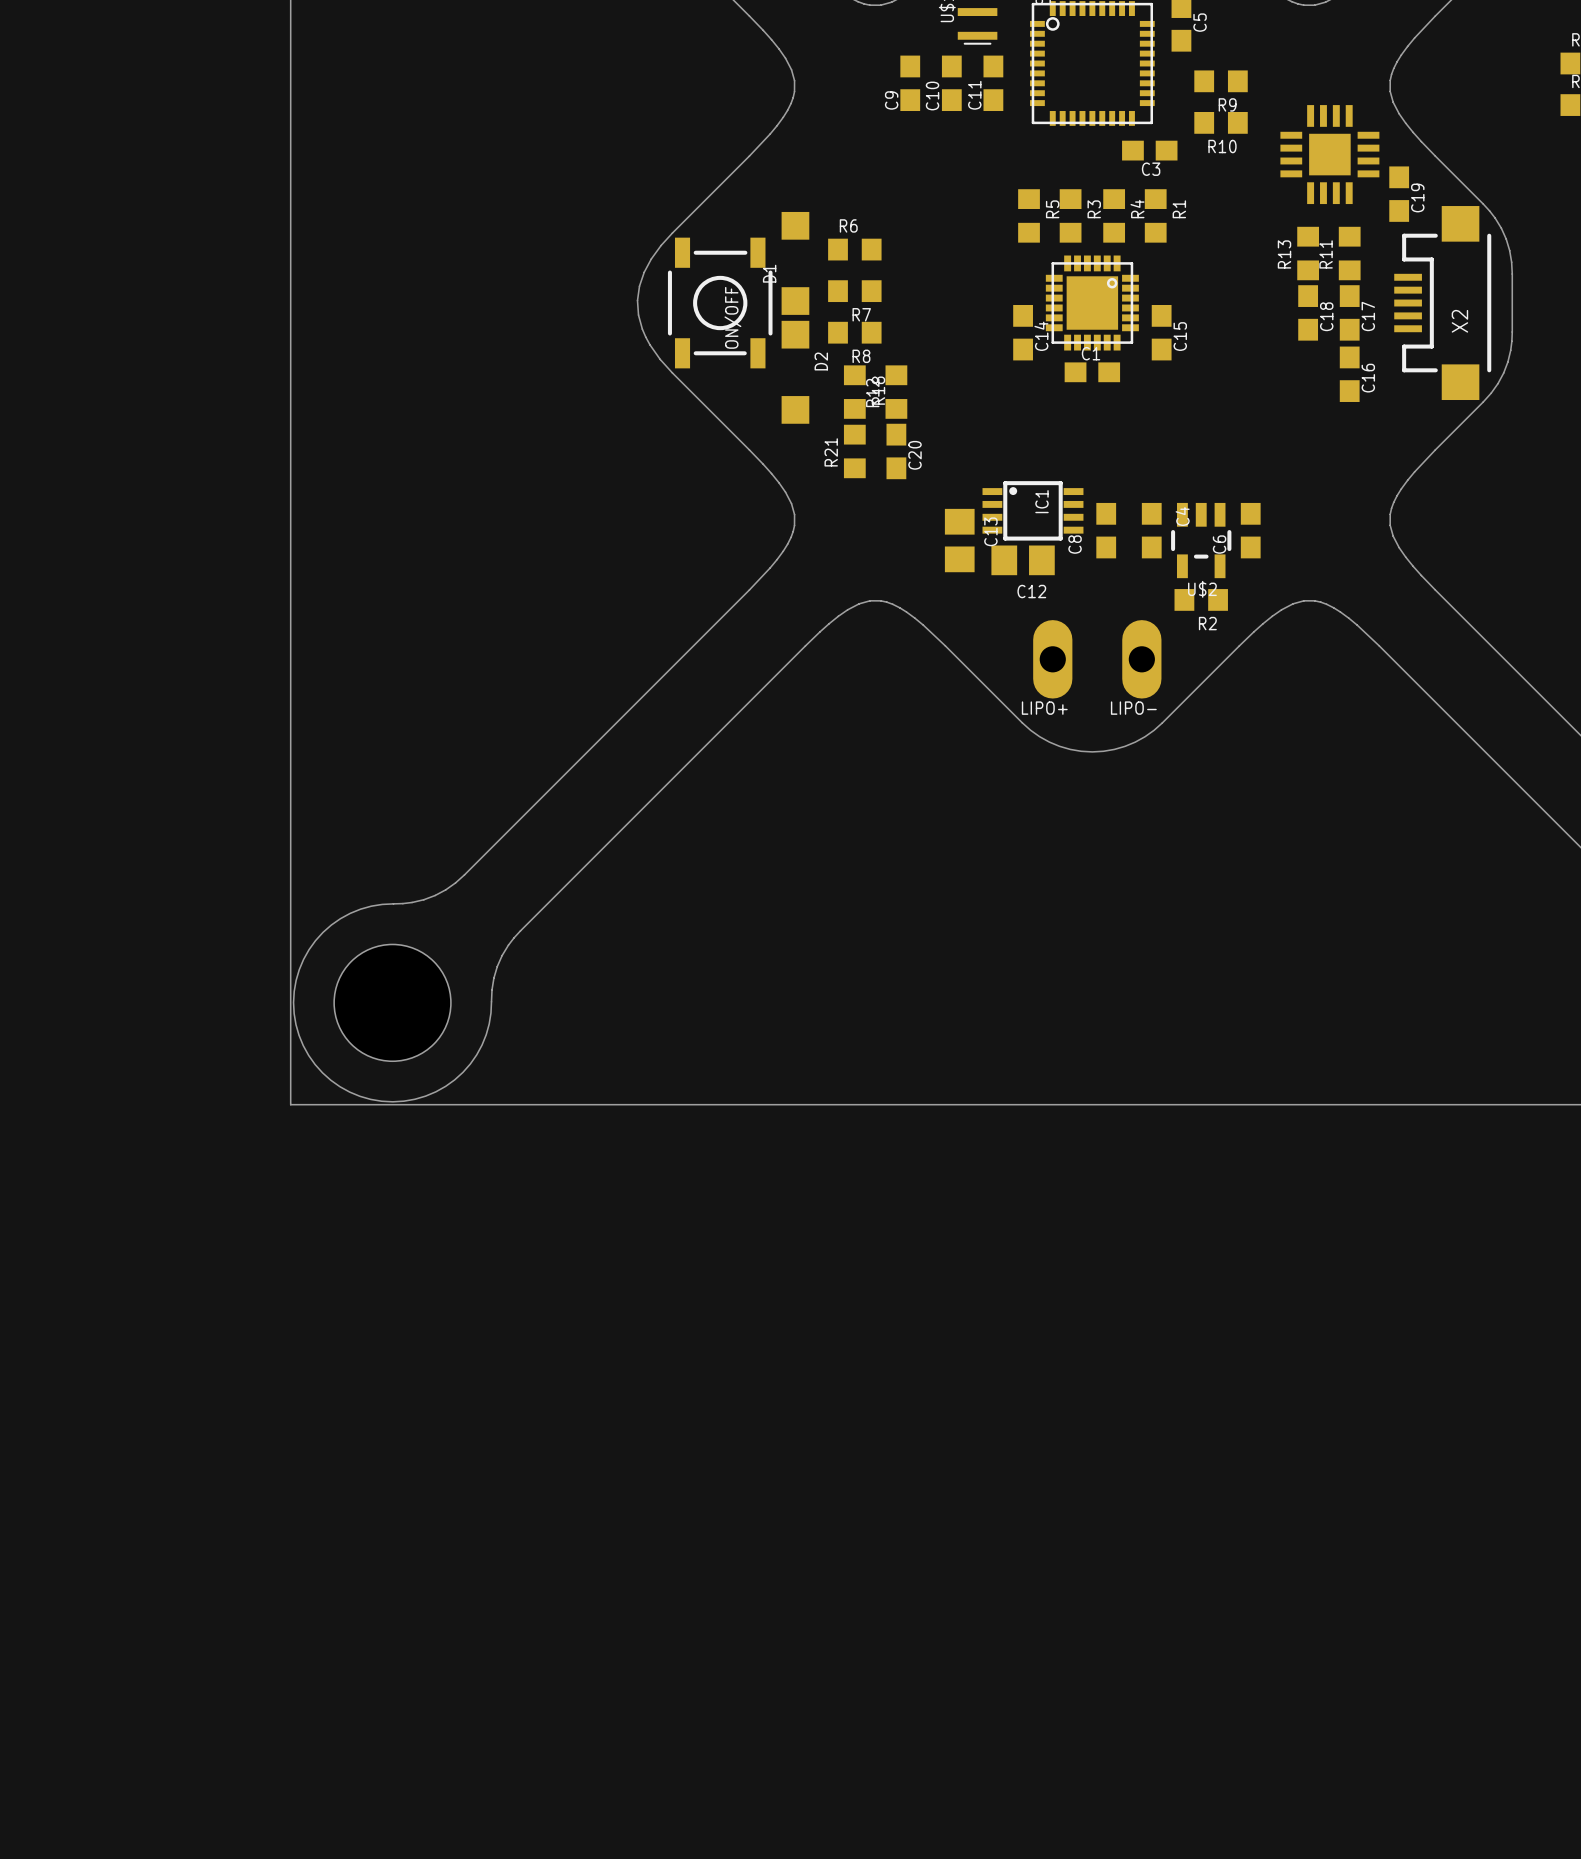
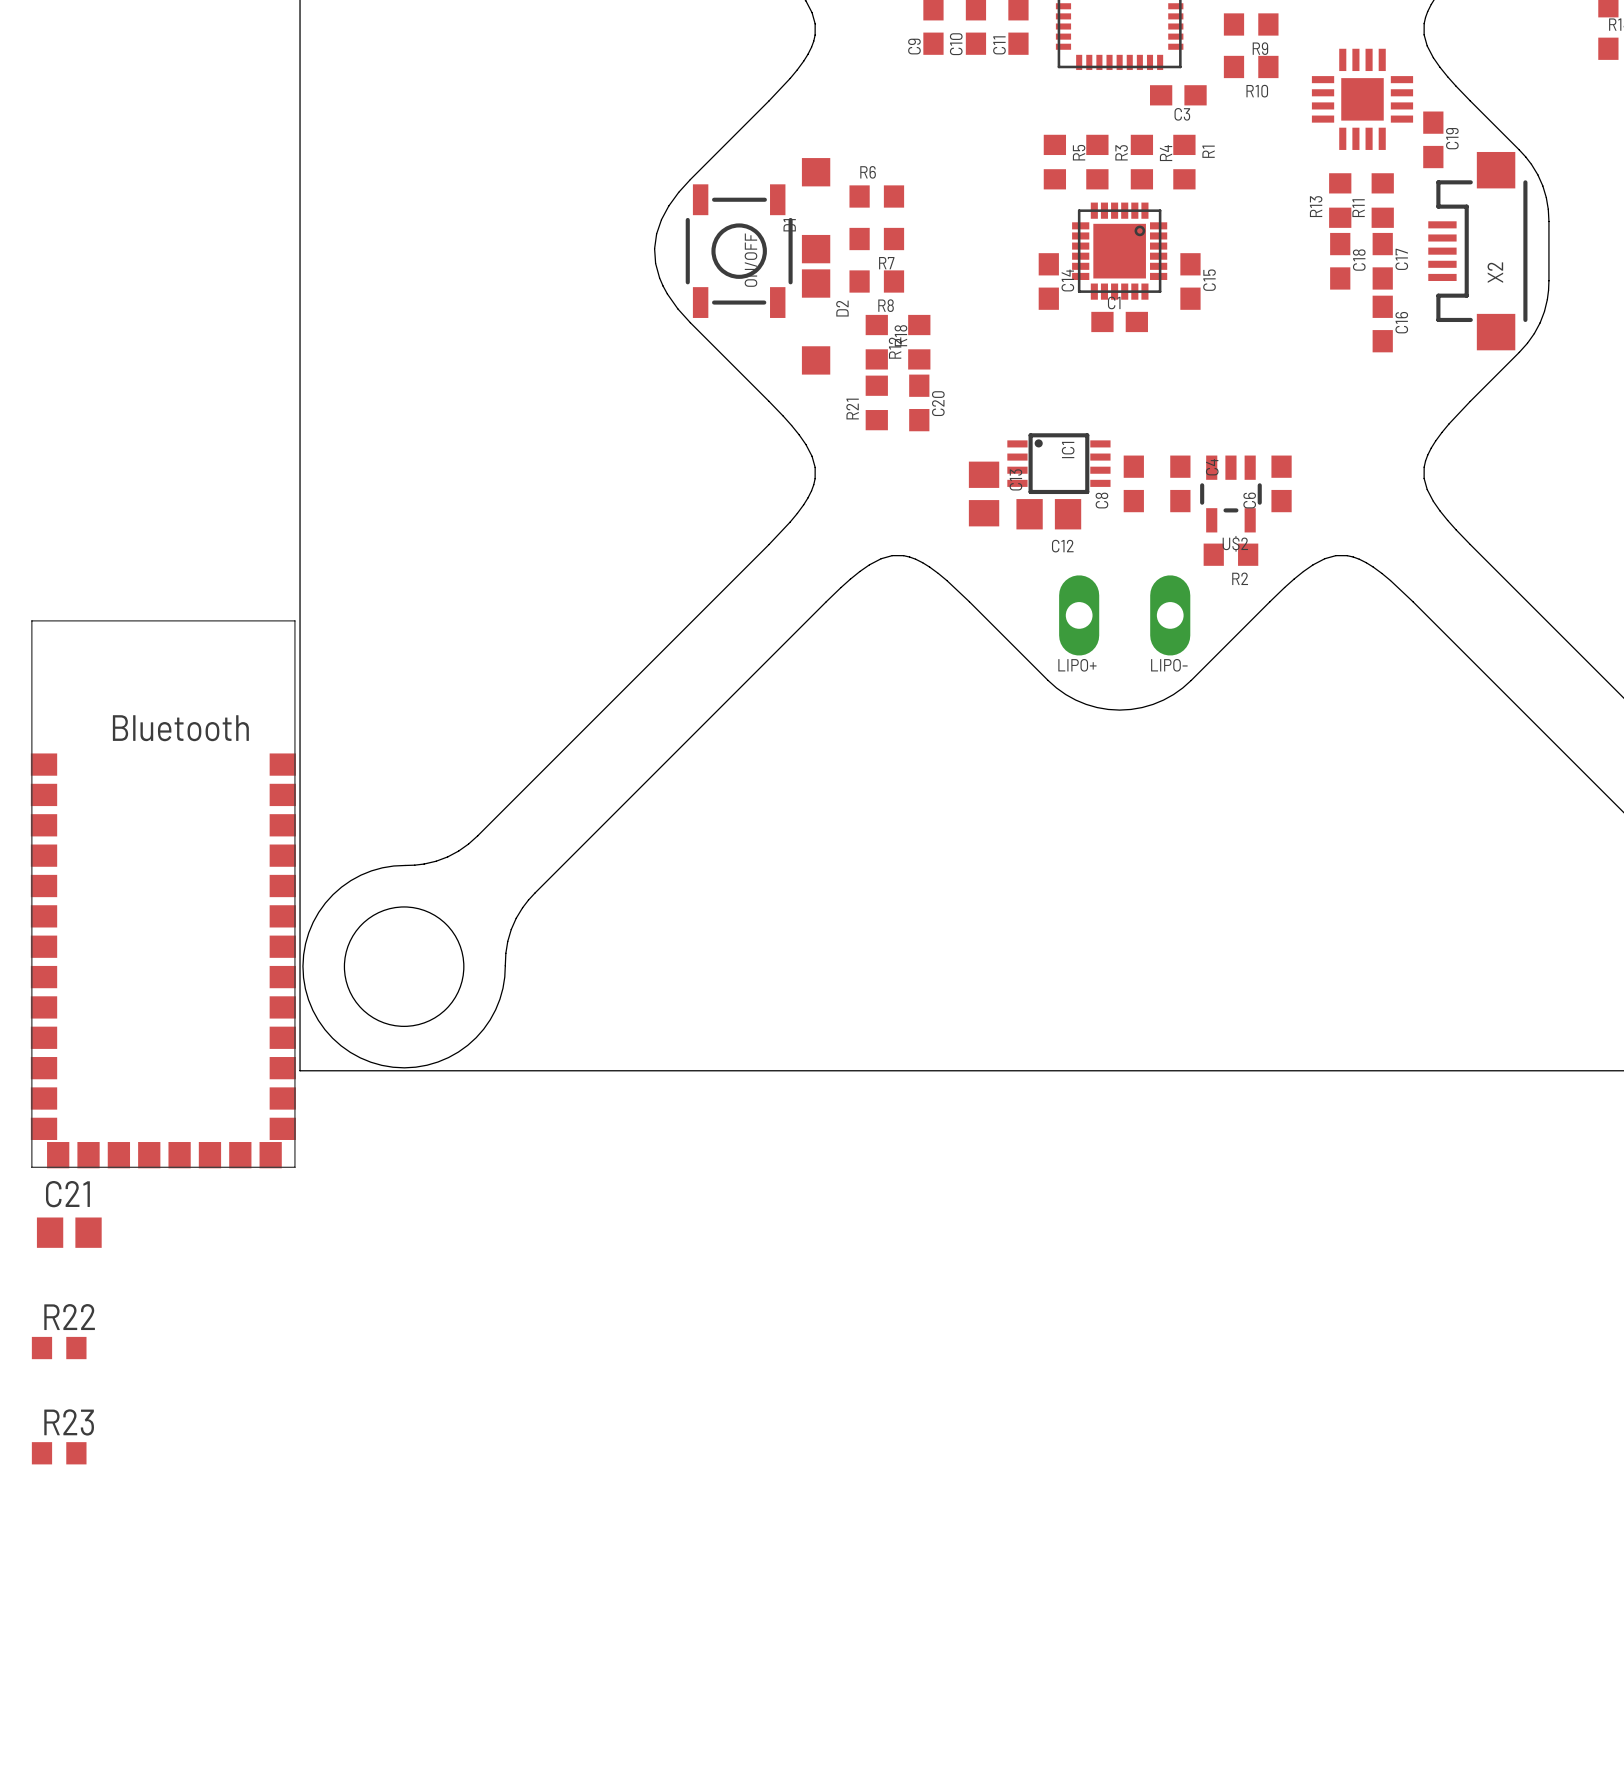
part: none -> (163, 894)
C21: none -> (69, 1232)
R22: none -> (59, 1348)
R23: none -> (59, 1453)

